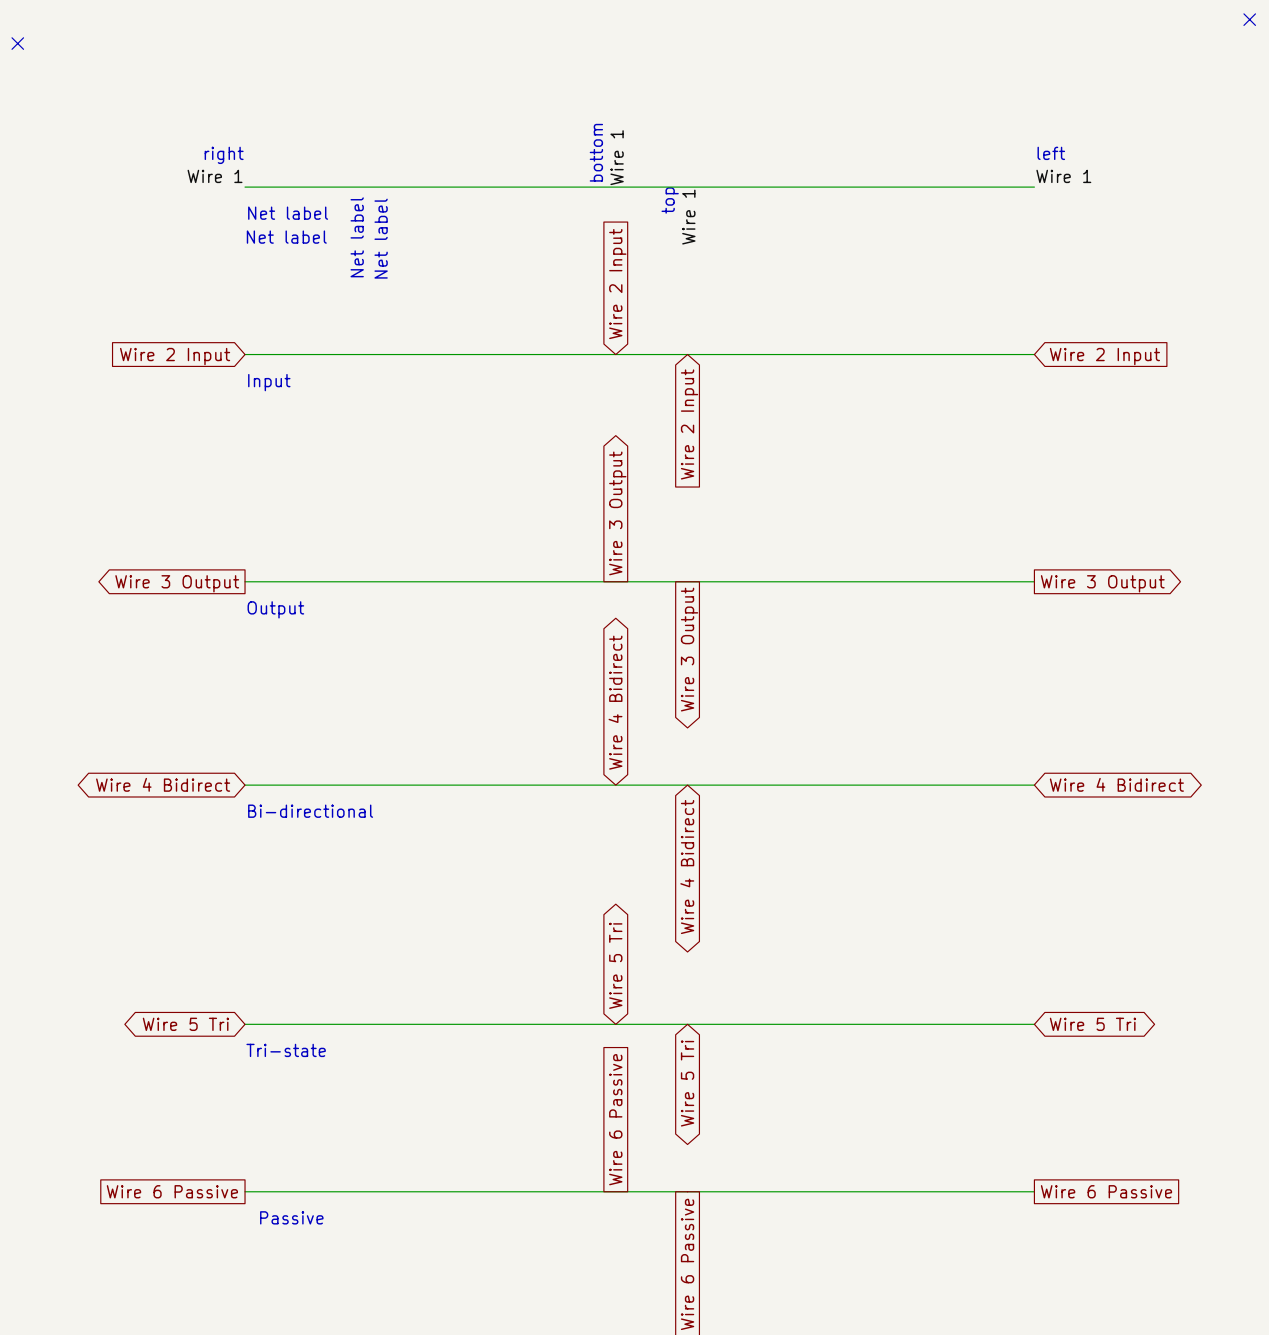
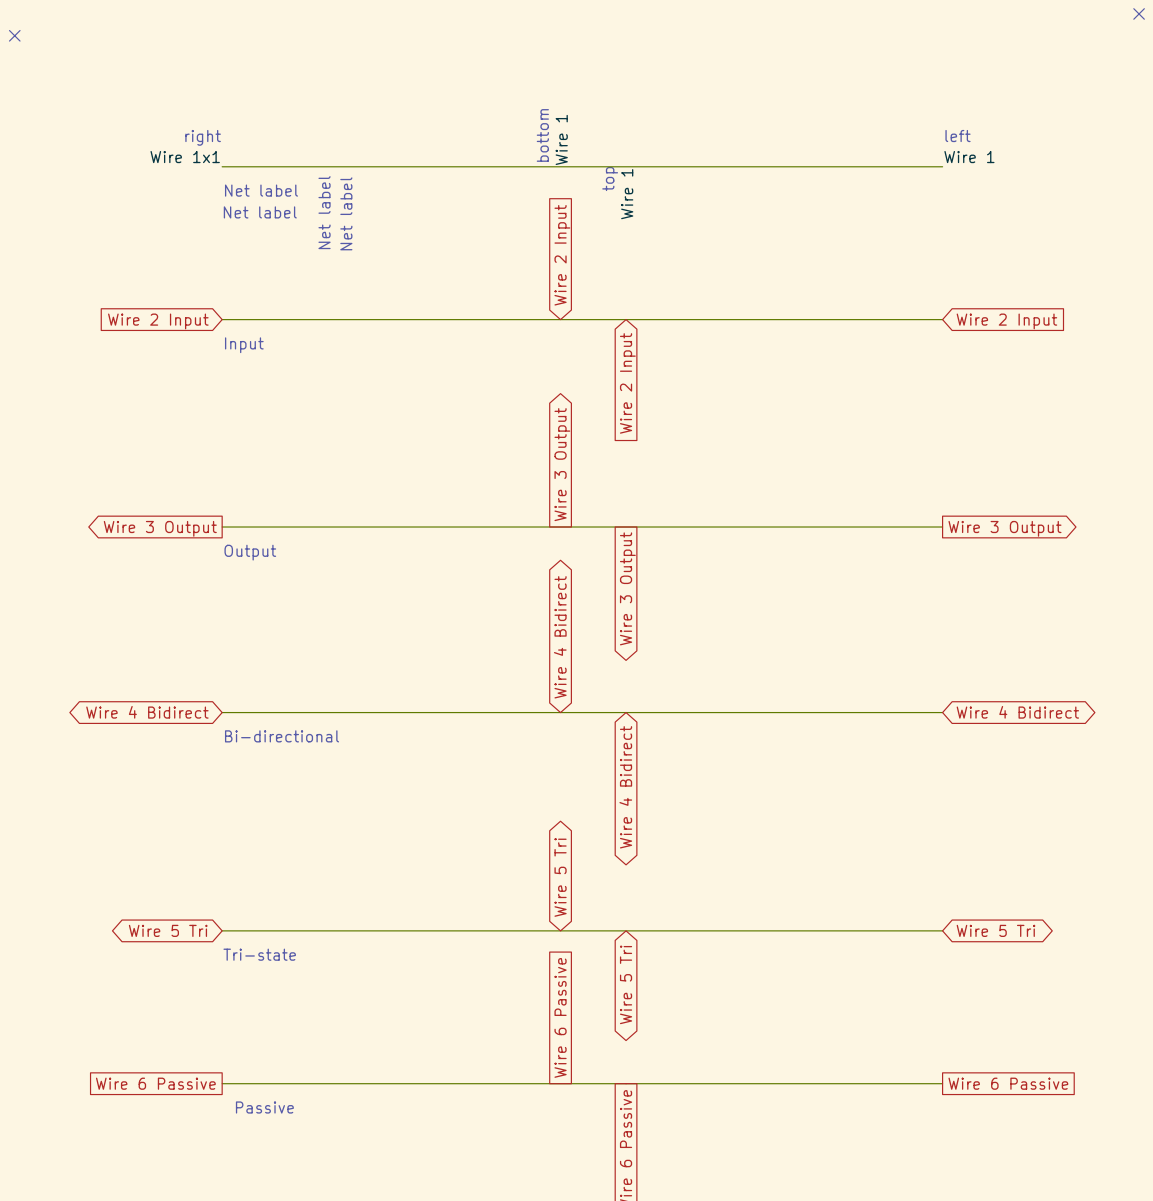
label: Wire 1 (215, 176) -> Wire 1x1 (185, 157)

